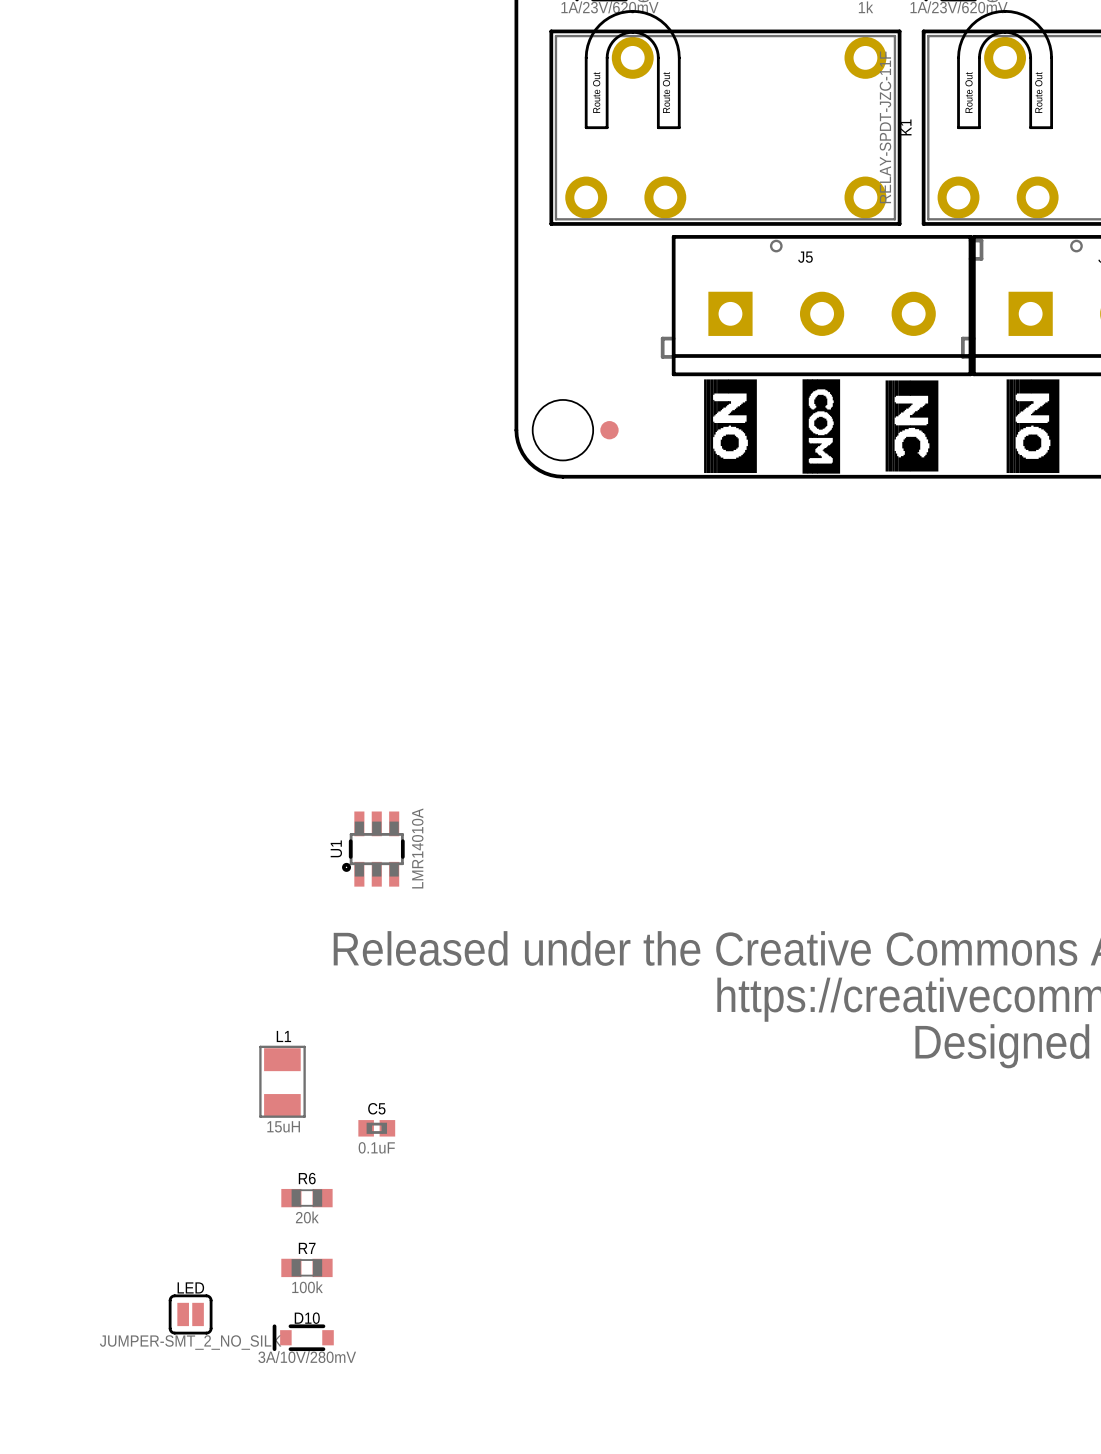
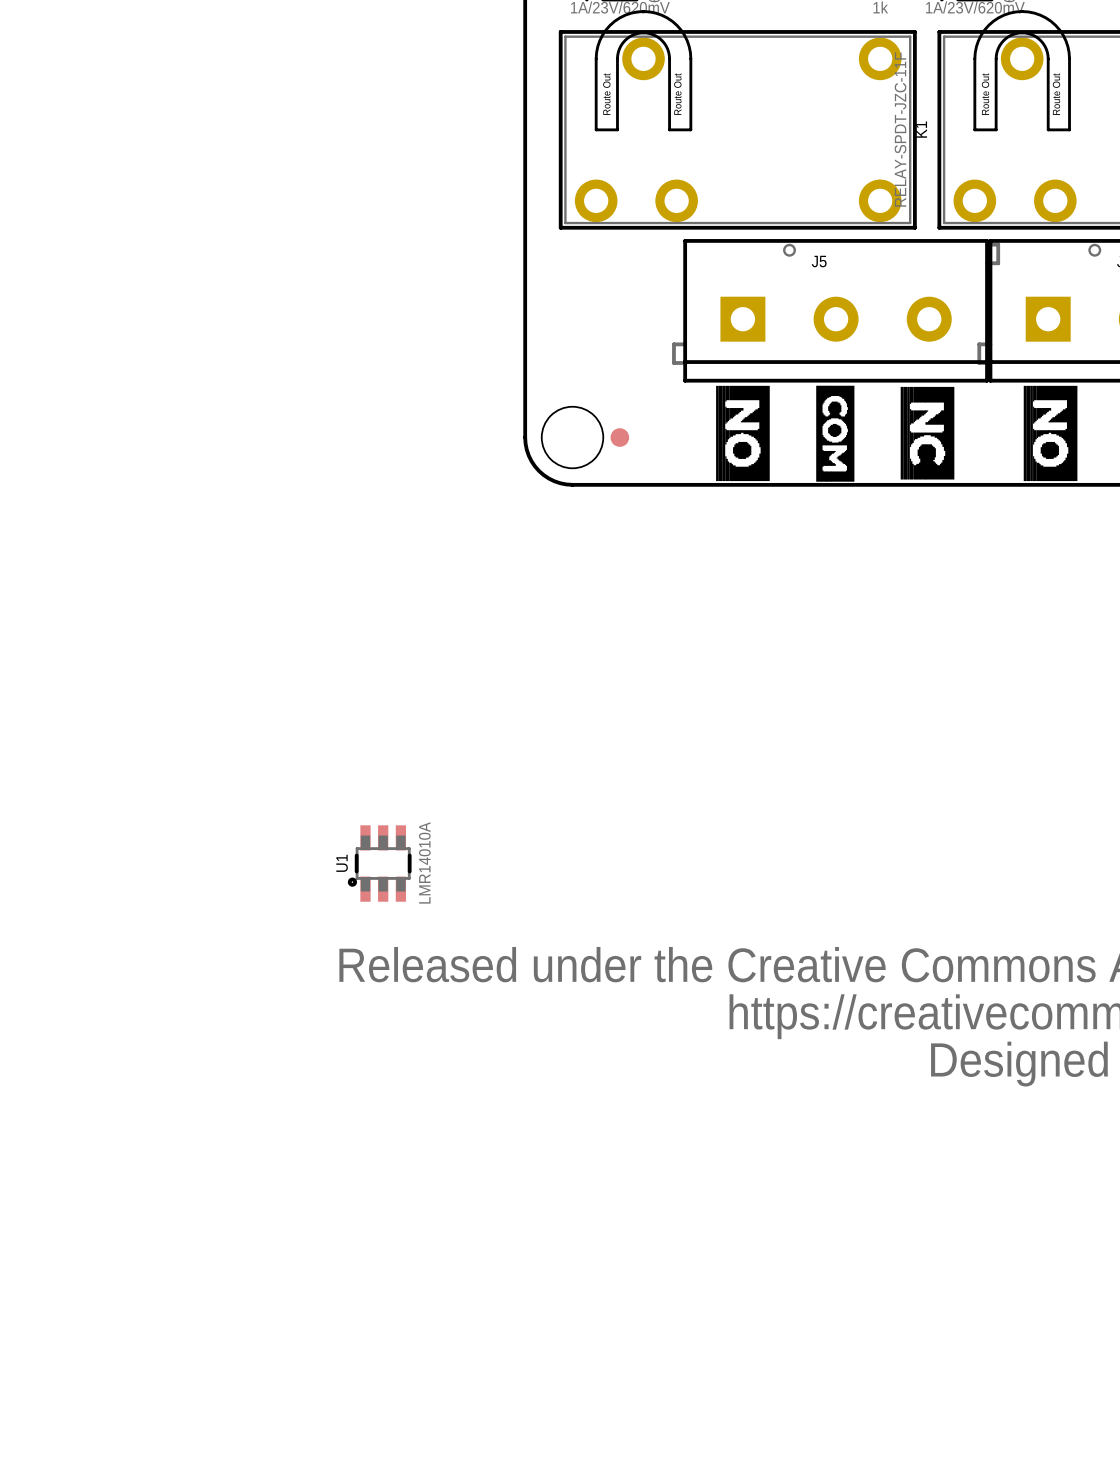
L1: 15uH (282, 1081) -> none
C5: 0.1uF (376, 1128) -> none
R6: 20k (306, 1198) -> none
R7: 100k (306, 1267) -> none
LED: JUMPER-SMT_2_NO_SILK (190, 1314) -> none
D10: 3A/10V/280mV (303, 1337) -> none

